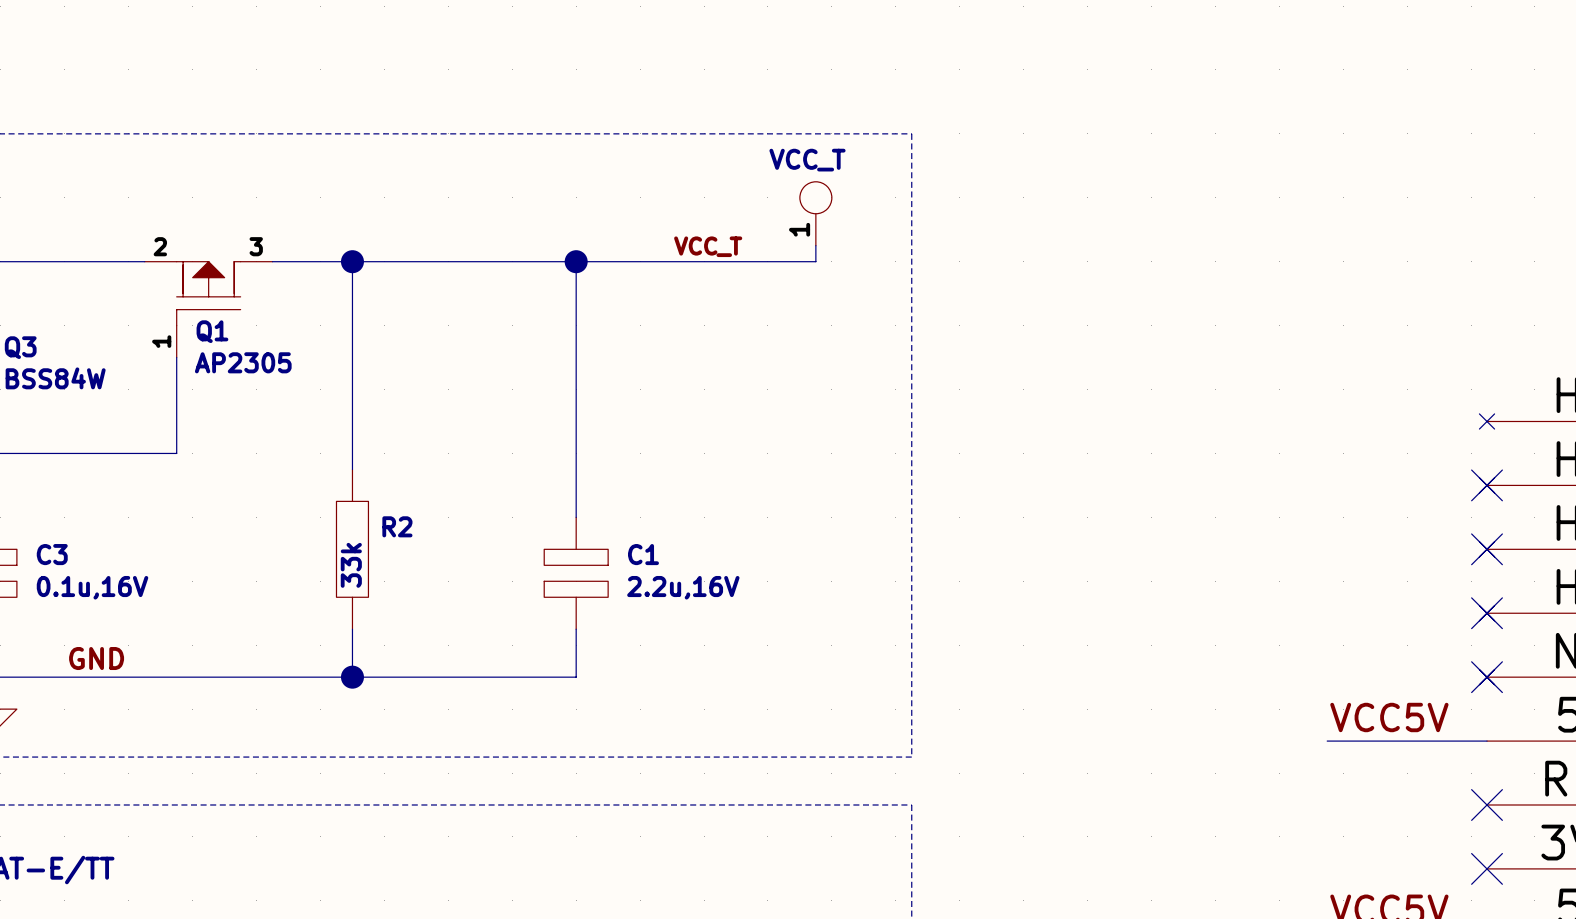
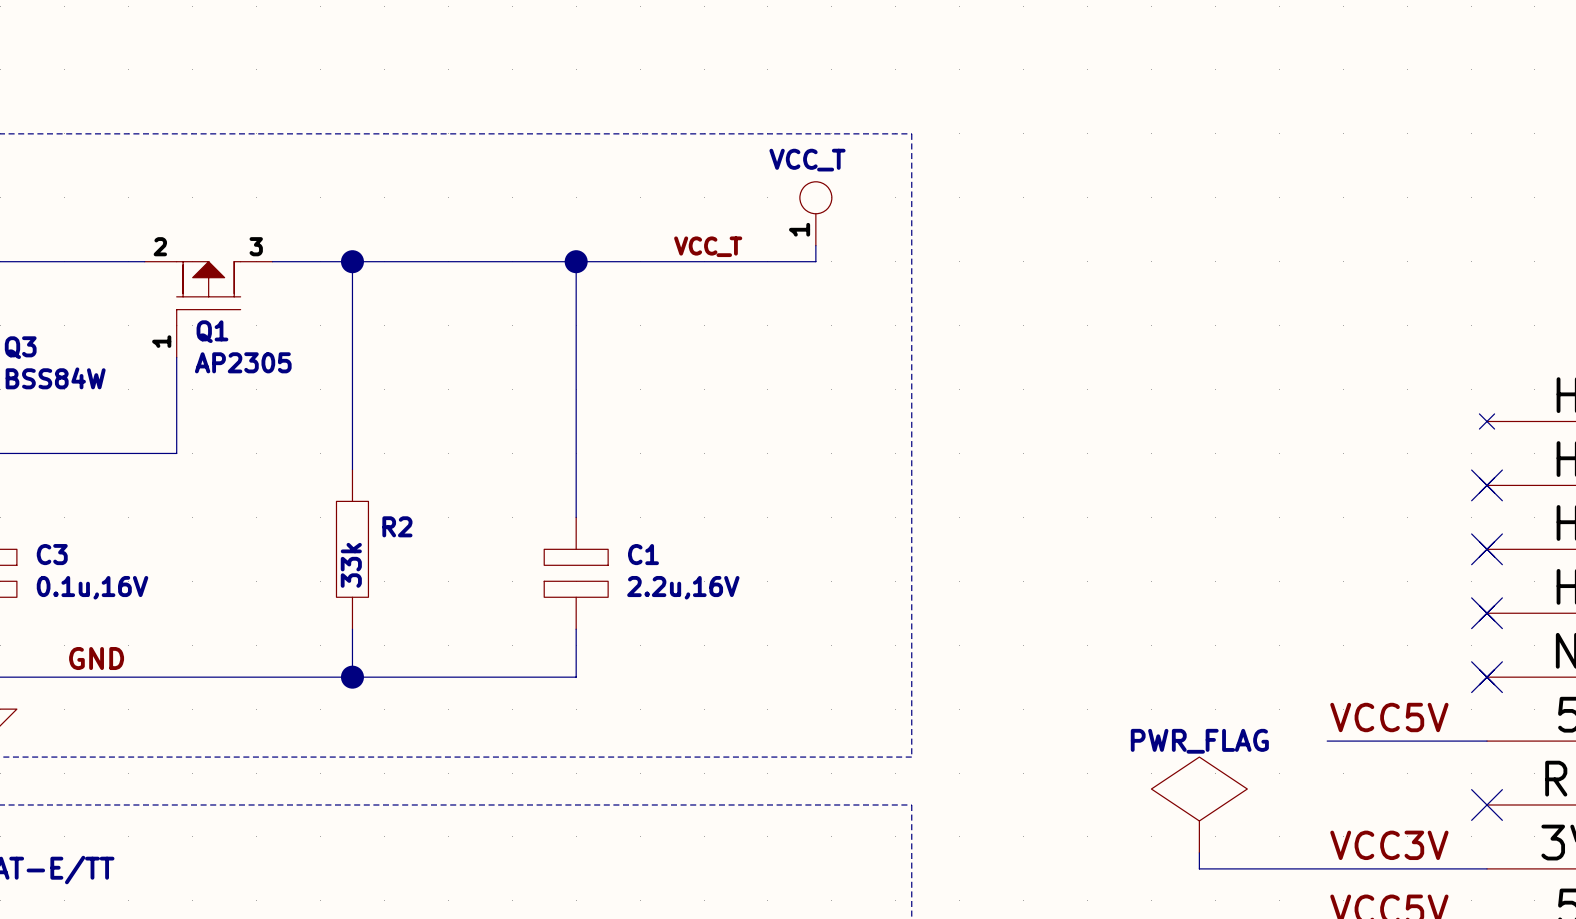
power symbol: none -> PWR_FLAG (1199, 804)
label: none -> VCC3V (1389, 845)
wire: none -> (1199, 852) (1199, 868) (1487, 868)
no-connect mark: (1487, 868) -> none

